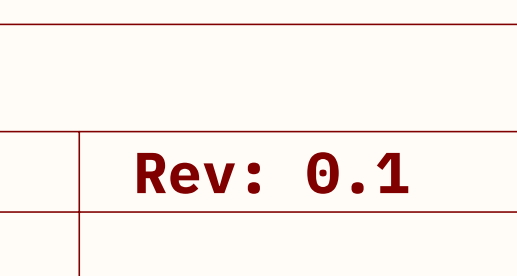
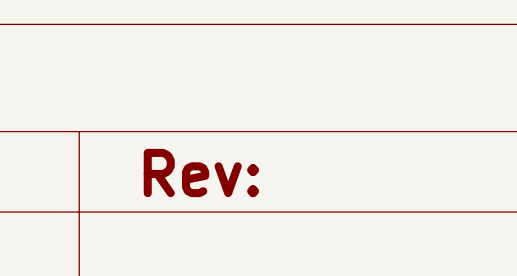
title block: Rev: 0.1 (272, 173) -> Rev: (201, 173)

